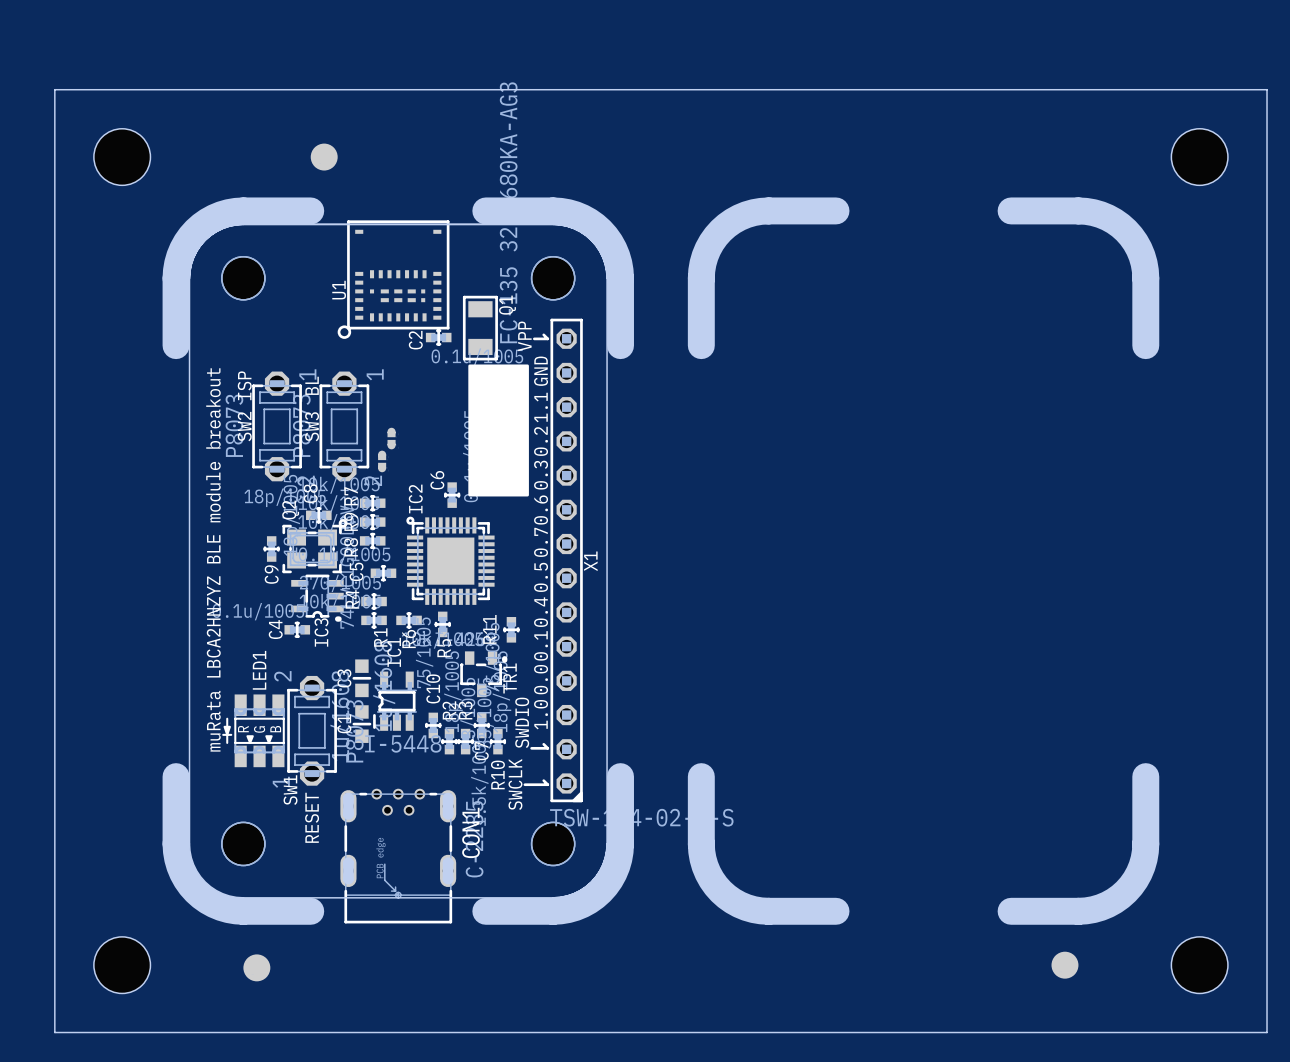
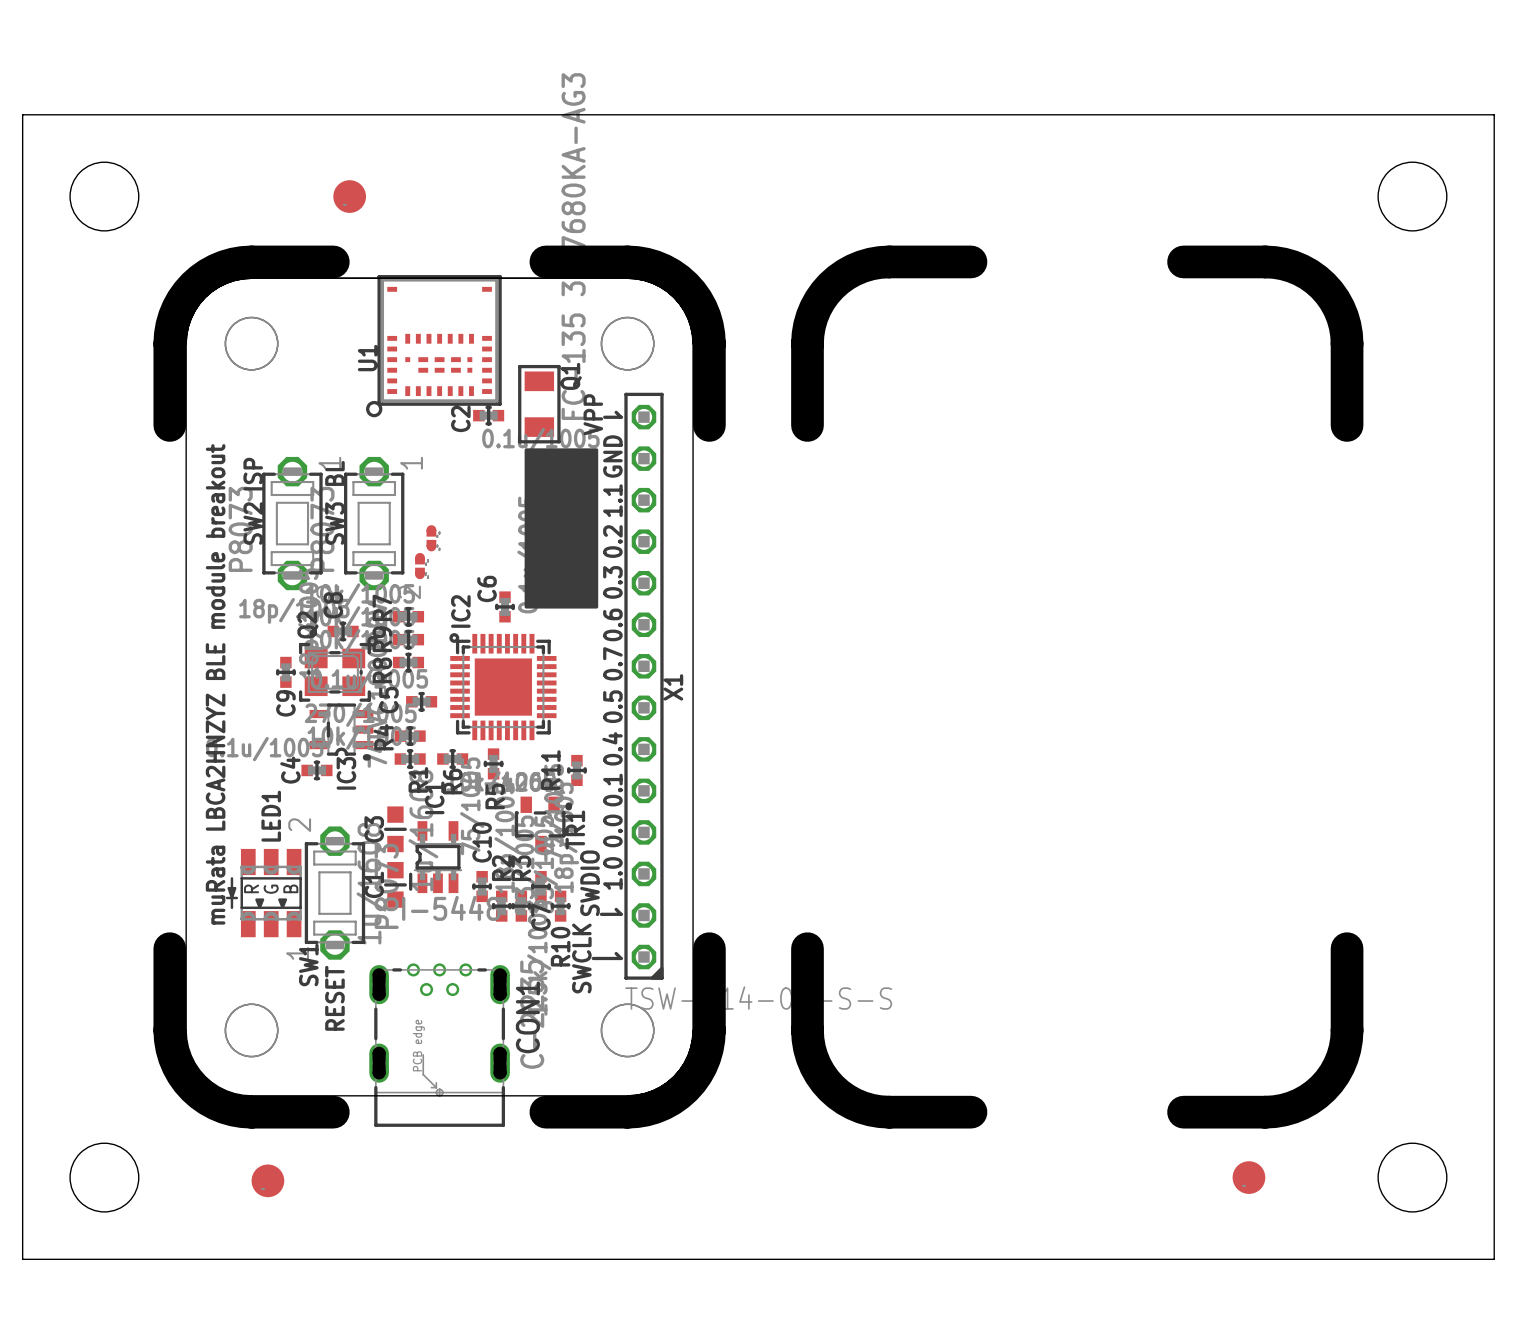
U1 footprint: [337, 220, 450, 339] -> [366, 275, 502, 418]

